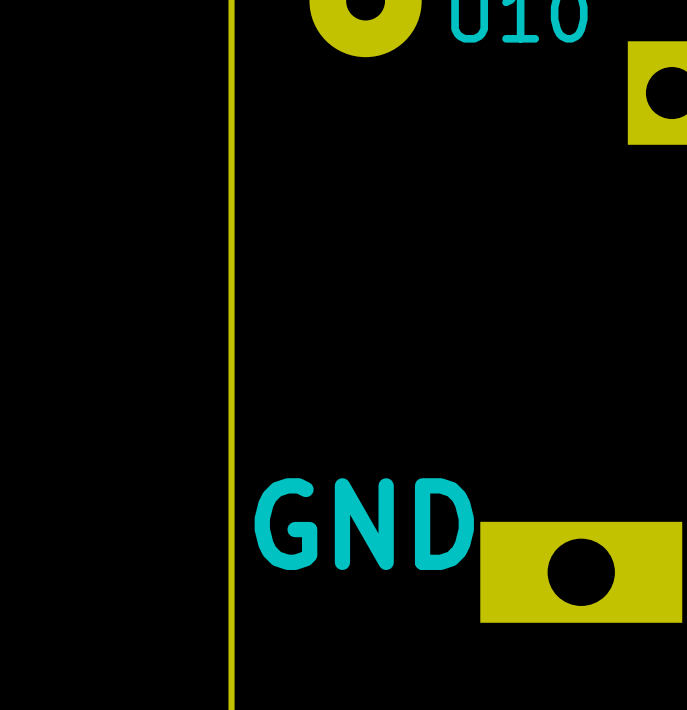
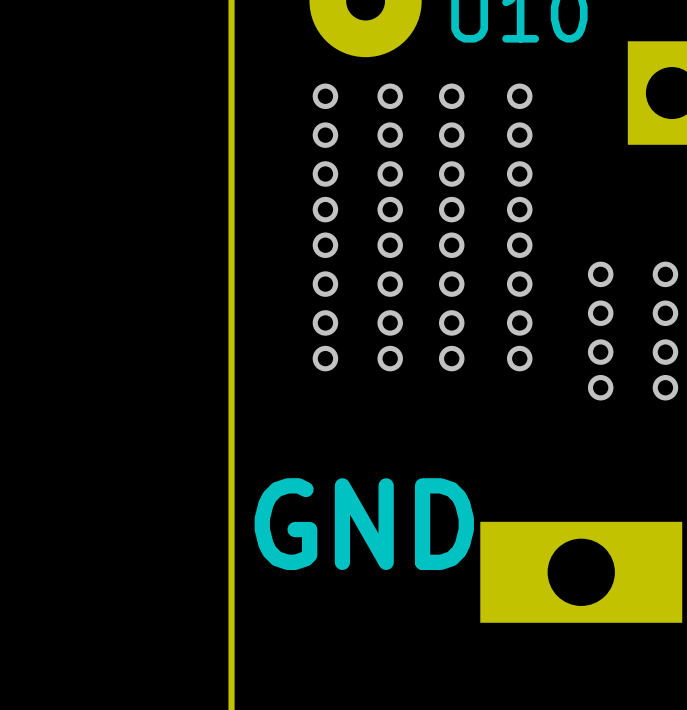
via: none -> (325, 96)
via: none -> (390, 96)
via: none -> (451, 96)
via: none -> (519, 96)
via: none -> (325, 135)
via: none -> (390, 135)
via: none -> (451, 135)
via: none -> (519, 135)
via: none -> (325, 173)
via: none -> (390, 173)
via: none -> (451, 173)
via: none -> (519, 173)
via: none -> (325, 209)
via: none -> (390, 209)
via: none -> (451, 209)
via: none -> (519, 209)
via: none -> (325, 245)
via: none -> (390, 245)
via: none -> (451, 245)
via: none -> (519, 245)
via: none -> (600, 274)
via: none -> (665, 274)
via: none -> (325, 284)
via: none -> (390, 284)
via: none -> (451, 284)
via: none -> (519, 284)
via: none -> (600, 313)
via: none -> (665, 313)
via: none -> (325, 322)
via: none -> (390, 322)
via: none -> (451, 322)
via: none -> (519, 322)
via: none -> (600, 352)
via: none -> (665, 352)
via: none -> (325, 358)
via: none -> (390, 358)
via: none -> (451, 358)
via: none -> (519, 358)
via: none -> (600, 387)
via: none -> (665, 387)

